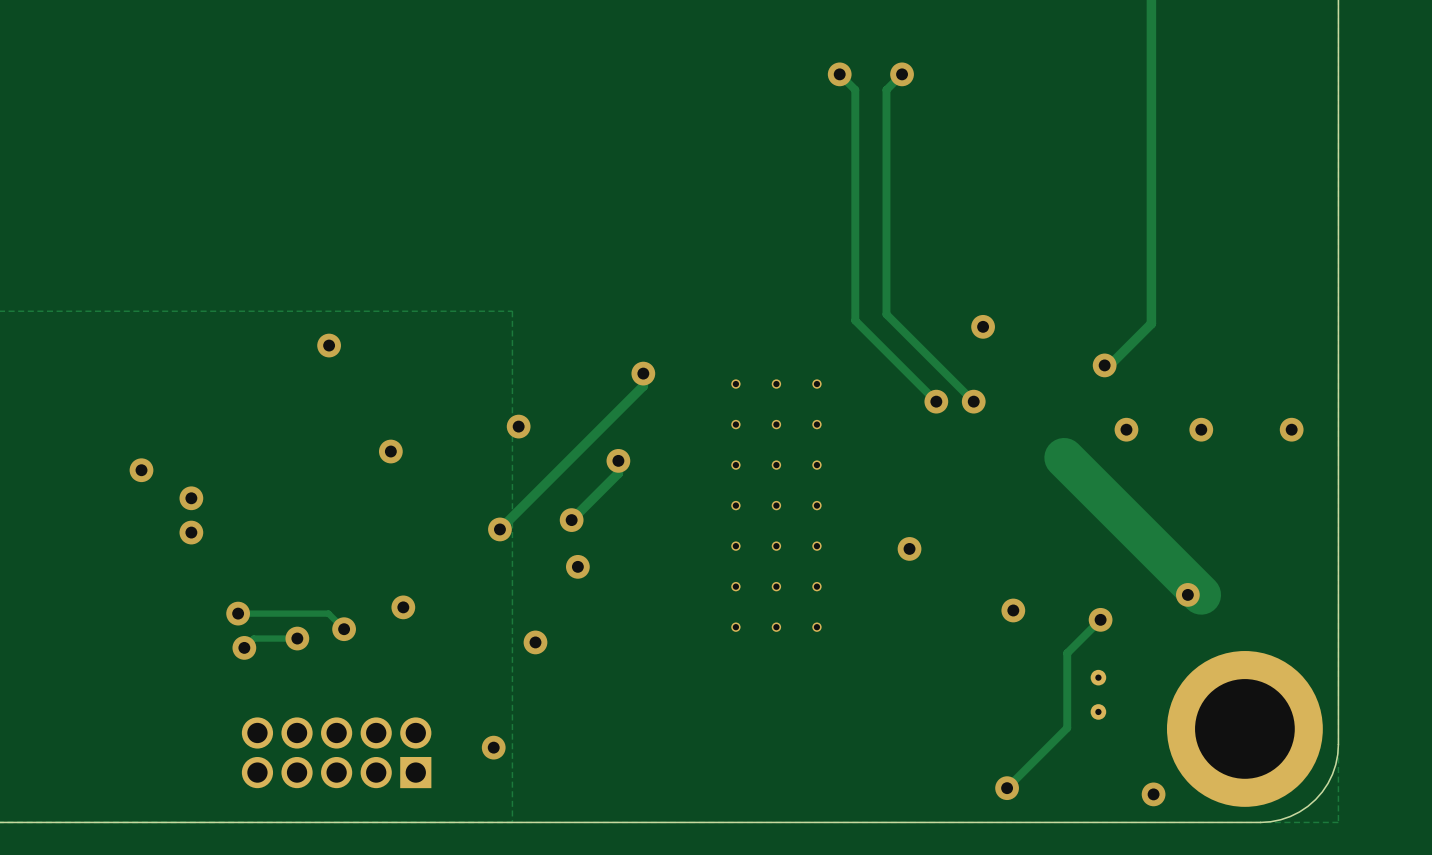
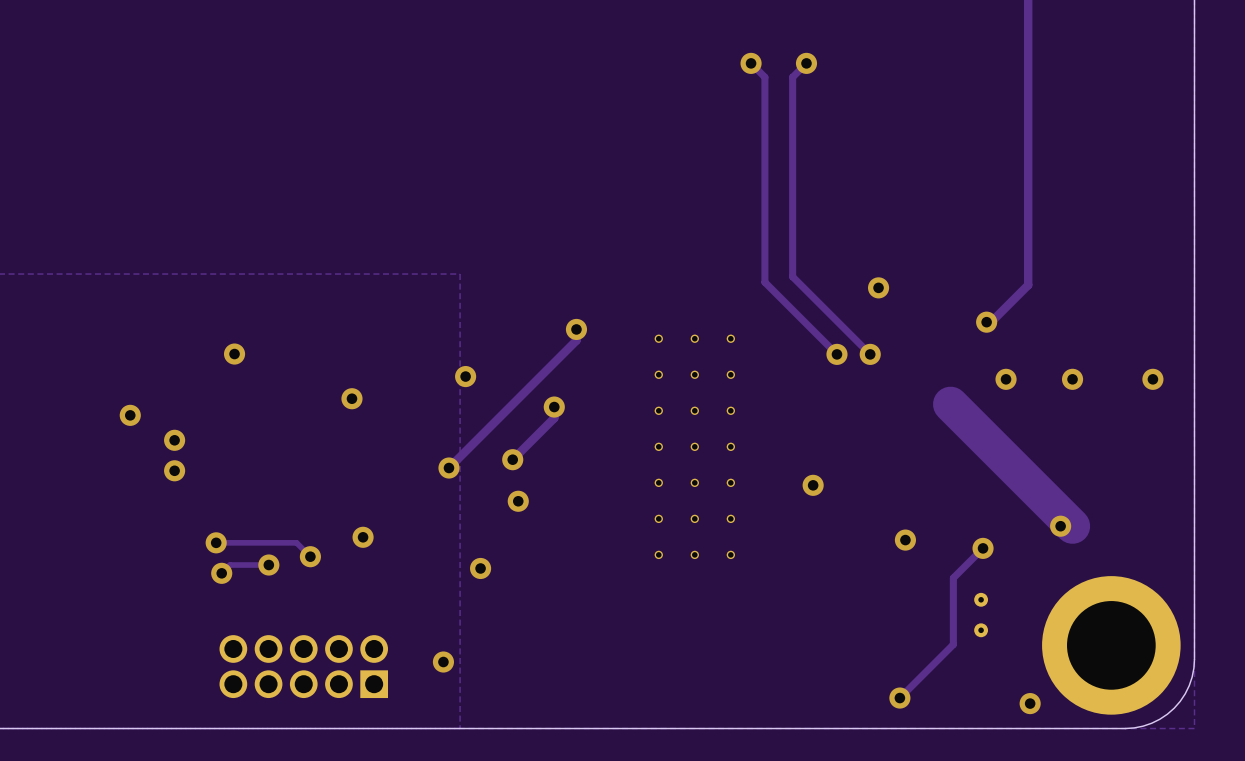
via position: (329, 345) -> (234, 354)

